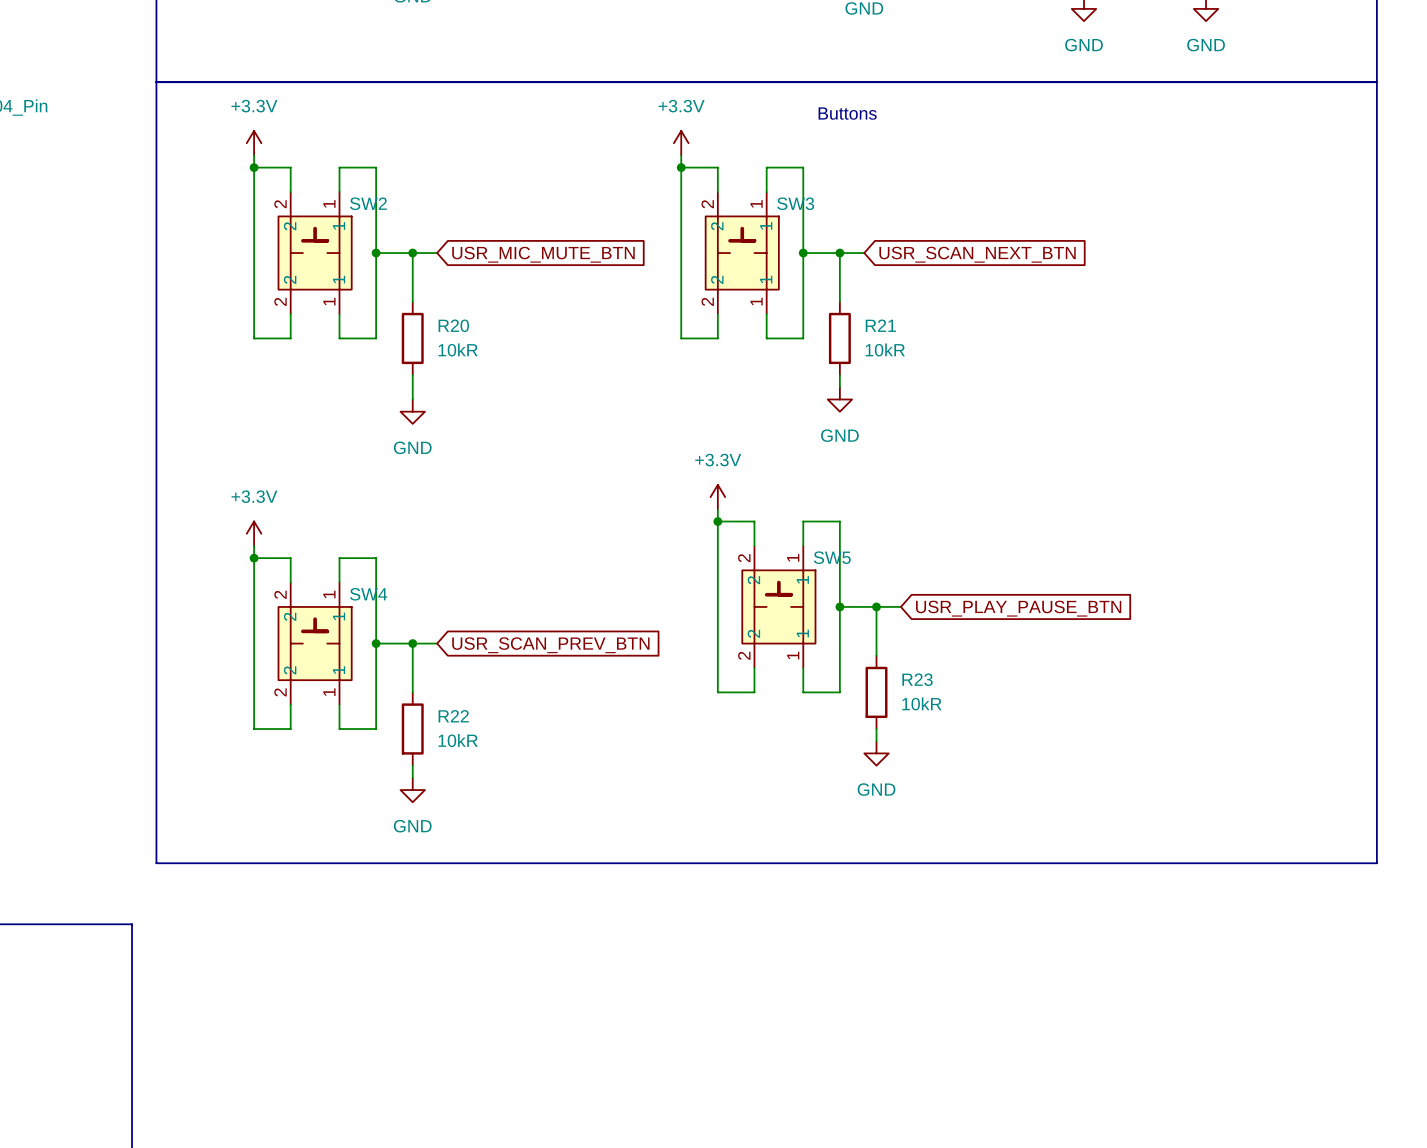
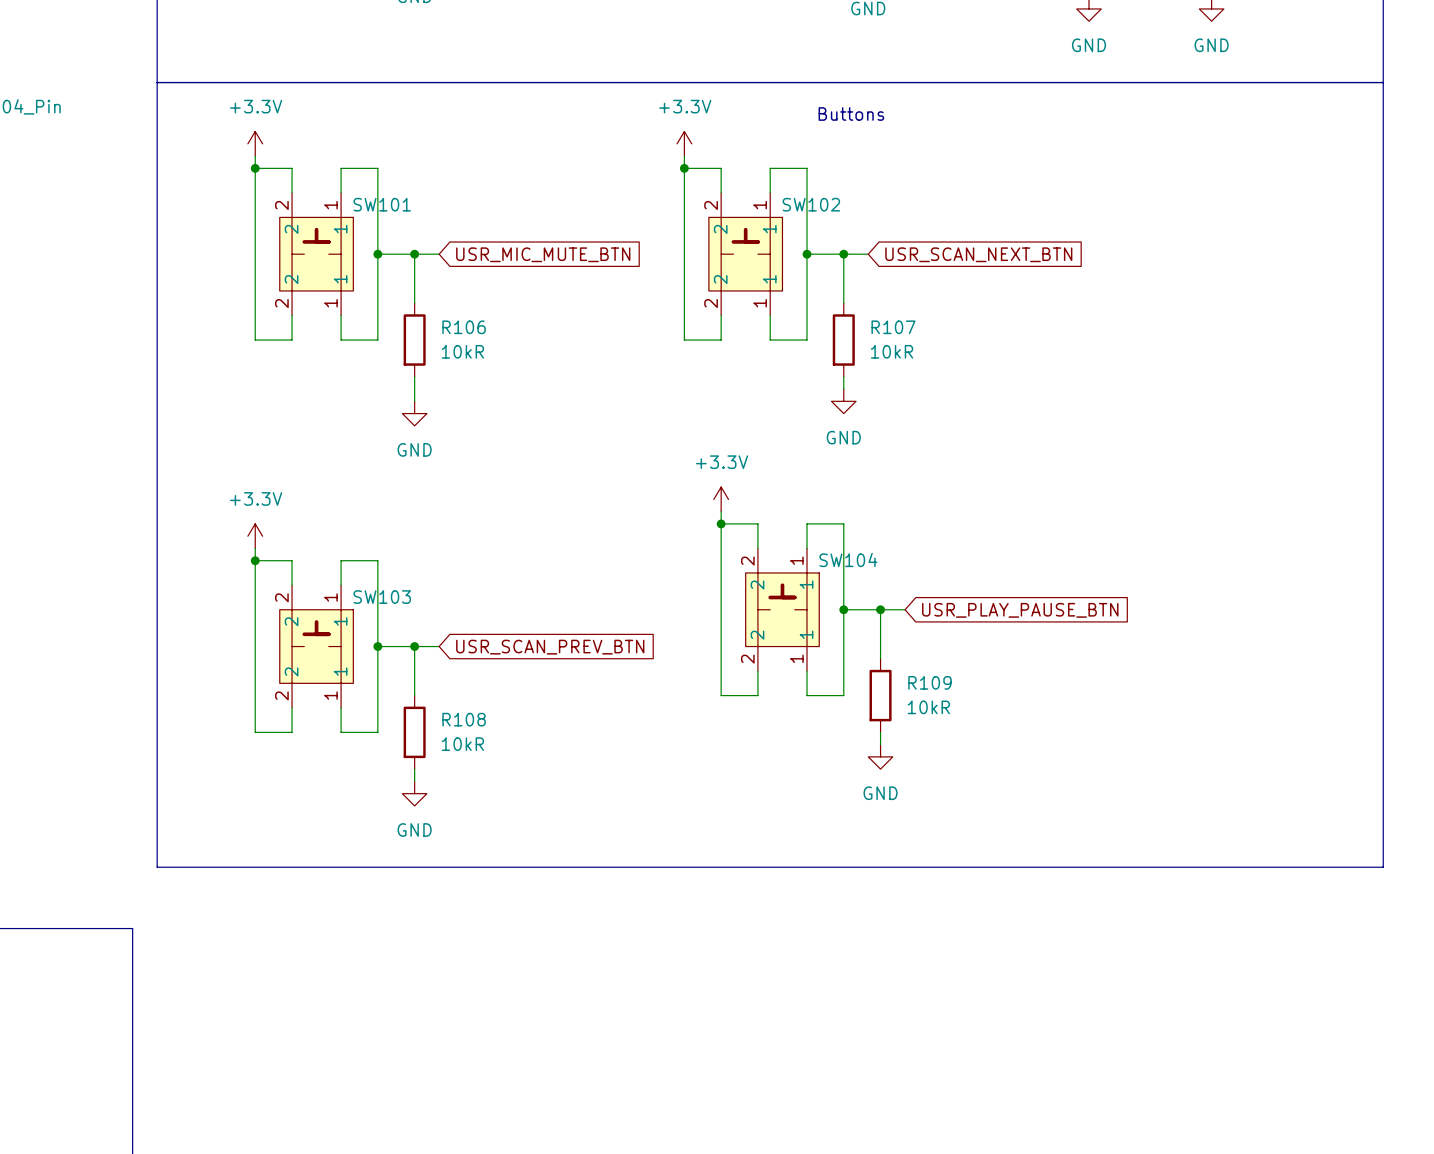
SW2 name: SW2 (368, 203) -> SW101 (382, 204)
SW3 name: SW3 (795, 203) -> SW102 (811, 204)
R20 name: R20 (453, 325) -> R106 (464, 327)
R21 name: R21 (880, 325) -> R107 (893, 327)
SW5 name: SW5 (832, 557) -> SW104 (848, 559)
SW4 name: SW4 (368, 594) -> SW103 (382, 597)
R23 name: R23 (917, 679) -> R109 (929, 682)
R22 name: R22 (453, 716) -> R108 (464, 719)

